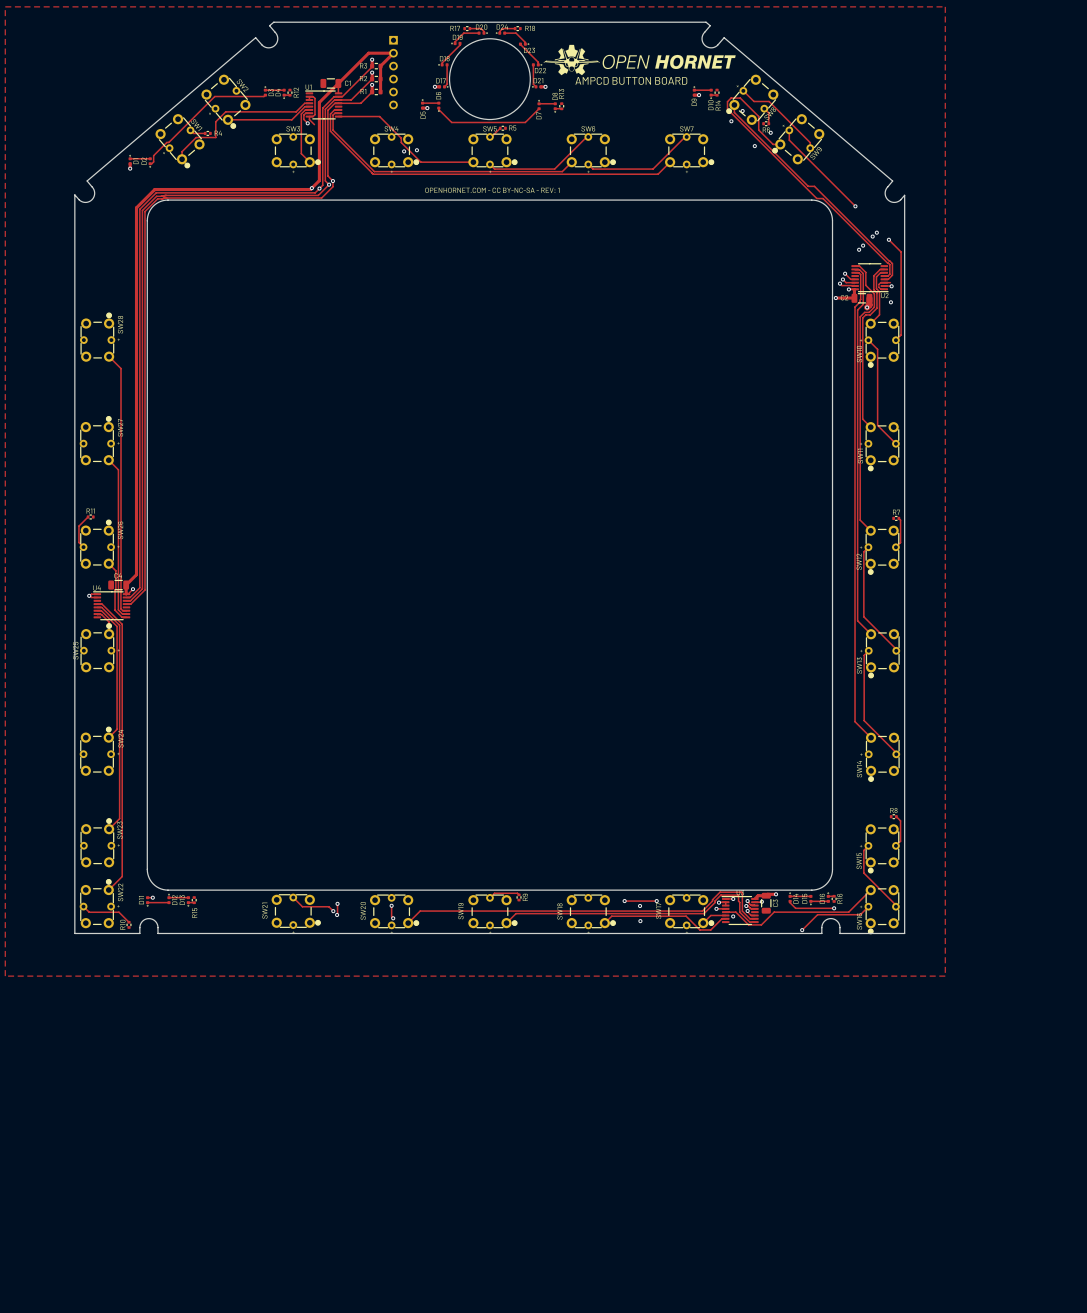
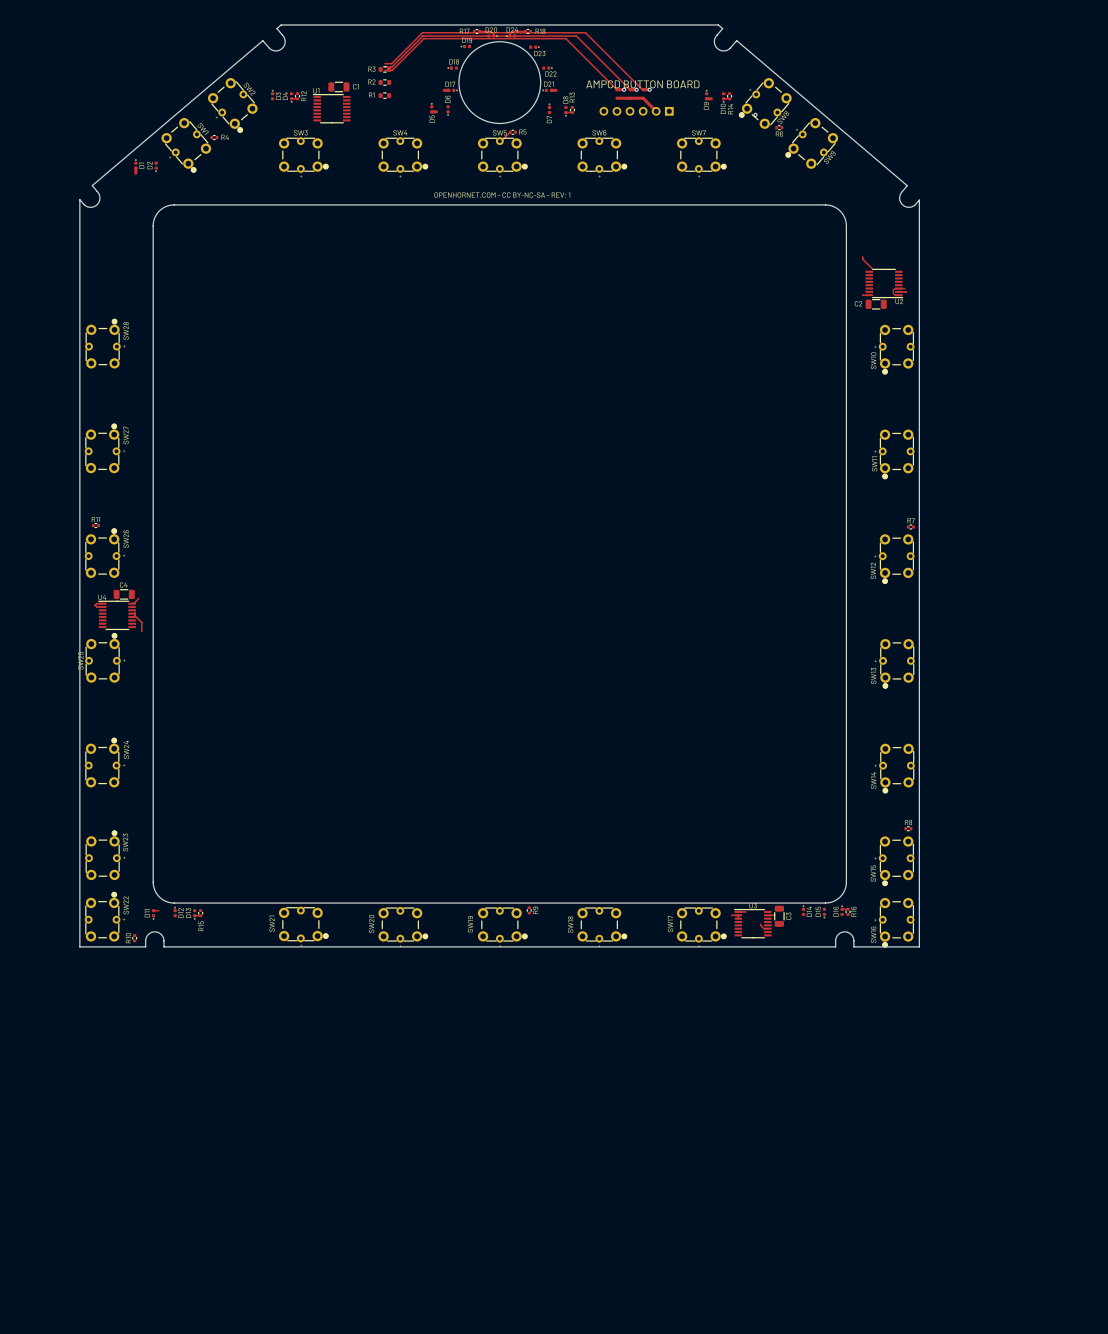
zone outline: (5, 6) (5, 976) (945, 976) (945, 6) (5, 6) -> none
track: (463, 33) (455, 43) -> (473, 36) (422, 36) (391, 67) (384, 67)
track: none -> (488, 36) (514, 36)
track: (516, 33) (525, 44) -> (526, 36) (576, 36) (630, 89) (636, 89)
track: (460, 43) (442, 64) -> none
track: (520, 44) (538, 62) (538, 64) -> none
drawing: [543, 44, 736, 76] -> none
track: (372, 59) (372, 66) (342, 96) (334, 96) (322, 108) (322, 185) (315, 192) (156, 192) (139, 209) (139, 587) (130, 597) (126, 597) -> none
via: (372, 59) -> none
track: none -> (384, 63) (391, 63) (422, 32) (585, 32) (642, 89) (649, 89)
track: (447, 64) (447, 84) (444, 86) -> none
track: (533, 64) (533, 84) (535, 86) -> none
track: none -> (384, 70) (392, 70) (424, 38) (565, 38) (616, 89) (624, 89)
track: (372, 72) (372, 79) (351, 99) (334, 99) (325, 109) (325, 180) (329, 184) (318, 195) (166, 195) -> none
via: (372, 72) -> none
part: (393, 72) -> none
track: (338, 83) (338, 93) -> none
track: (372, 84) (372, 92) (360, 103) (334, 103) (327, 110) (327, 176) (332, 181) (332, 186) (321, 198) (166, 198) -> none
via: (372, 84) -> none
via: (434, 86) -> none
via: (545, 86) -> none
via: none -> (624, 89)
via: none -> (636, 89)
via: none -> (649, 89)
track: (265, 90) (284, 90) -> none
track: (694, 90) (711, 90) -> none
track: (743, 90) (754, 101) (769, 101) (810, 142) (810, 148) -> none
track: (380, 92) (380, 66) (393, 53) (368, 53) (319, 102) (319, 180) (310, 189) (154, 189) (136, 207) (136, 574) (126, 585) (126, 593) -> none
track: none -> (616, 98) (643, 98) (656, 111)
track: (265, 95) (214, 96) (153, 155) (153, 161) (150, 163) -> none
via: (699, 95) -> none
track: (309, 99) (309, 96) (314, 98) (314, 114) (309, 116) (309, 119) (314, 124) -> none
track: (309, 103) (304, 103) (296, 111) (225, 111) (215, 121) (215, 137) (196, 137) (182, 151) (182, 159) -> none
track: (422, 103) (438, 103) -> none
track: (539, 103) (555, 103) -> none
track: (734, 104) (734, 112) (808, 186) (814, 186) (892, 263) (892, 275) (888, 279) (884, 279) -> none
track: (309, 106) (305, 106) (291, 119) (227, 119) -> none
part: none -> (636, 111)
via: (427, 108) -> none
track: (438, 108) (451, 122) (525, 122) (539, 108) -> none
track: (764, 108) (768, 113) (768, 123) -> none
track: (309, 109) (305, 109) (301, 114) (301, 153) (309, 162) -> none
track: (338, 109) (334, 109) (330, 114) (330, 131) (373, 174) (658, 174) (670, 162) -> none
track: (309, 113) (303, 115) (303, 119) (307, 123) -> none
track: (338, 113) (333, 115) (333, 130) (374, 171) (562, 171) (571, 162) -> none
track: (338, 116) (379, 116) (401, 138) (401, 142) (420, 162) (473, 162) -> none
via: (731, 121) -> none
via: (307, 123) -> none
track: (190, 130) (193, 133) (205, 133) -> none
track: (789, 130) (789, 140) (855, 206) -> none
via: (770, 132) -> none
track: (588, 136) (554, 169) (494, 169) (489, 164) -> none
track: (686, 136) (653, 169) (592, 169) (588, 164) -> none
track: (780, 144) (773, 144) (758, 130) (758, 116) (740, 98) (731, 98) (727, 101) (727, 109) (816, 198) (823, 198) (889, 264) (889, 274) (884, 276) -> none
via: (754, 146) -> none
via: (416, 150) -> none
via: (404, 151) -> none
track: (130, 158) (150, 158) -> none
via: (130, 168) -> none
via: (332, 181) -> none
via: (329, 184) -> none
via: (311, 188) -> none
via: (319, 188) -> none
track: (162, 196) (156, 196) (142, 210) (142, 588) (130, 600) (126, 600) -> none
track: (162, 198) (157, 198) (145, 211) (145, 589) (130, 604) (126, 604) -> none
via: (855, 206) -> none
via: (876, 232) -> none
via: (872, 236) -> none
track: (888, 239) (901, 251) (901, 335) (895, 340) -> none
via: (888, 239) -> none
via: (863, 245) -> none
via: (859, 249) -> none
track: none -> (862, 256) (872, 268)
track: (855, 266) (859, 266) (865, 272) (865, 285) (874, 293) (874, 307) (860, 316) (860, 520) (870, 530) -> none
track: (855, 269) (859, 269) (863, 273) (863, 304) (857, 310) (857, 620) (871, 634) -> none
track: (884, 269) (880, 269) (873, 275) (876, 308) (870, 314) (865, 314) (862, 317) (862, 419) (870, 427) -> none
track: (855, 272) (860, 274) (860, 299) (855, 307) (855, 721) (871, 737) -> none
track: (884, 272) (880, 272) (876, 276) (876, 288) (879, 291) (879, 314) (870, 323) -> none
track: (845, 273) (850, 279) (855, 279) -> none
via: (845, 273) -> none
track: (842, 279) (846, 282) (855, 282) -> none
via: (842, 279) -> none
track: (839, 283) (841, 285) (855, 285) -> none
via: (839, 283) -> none
via: (891, 286) -> none
via: (848, 289) -> none
track: (854, 289) (854, 298) (835, 298) -> none
via: (835, 298) -> none
track: (869, 298) (869, 305) (867, 307) -> none
via: (890, 302) -> none
via: (867, 307) -> none
track: (868, 340) (877, 349) (877, 425) (895, 443) -> none
track: (109, 356) (121, 368) (121, 591) -> none
track: (108, 460) (118, 469) (118, 590) -> none
track: (88, 516) (78, 526) (78, 542) (83, 547) -> none
track: (898, 518) (900, 520) (900, 542) (895, 547) -> none
track: (868, 547) (863, 551) (863, 616) (896, 650) -> none
track: (108, 563) (115, 570) (115, 610) (122, 617) (126, 617) -> none
via: (132, 589) -> none
track: (118, 590) (118, 609) (122, 614) (126, 613) -> none
track: (120, 591) (120, 608) (126, 610) -> none
via: (89, 595) -> none
track: none -> (134, 612) (134, 615) (141, 622) (141, 631)
track: (97, 604) (102, 604) (122, 624) (122, 876) (108, 890) -> none
track: (97, 607) (101, 607) (119, 625) (119, 818) (109, 829) -> none
track: (97, 610) (101, 610) (117, 626) (117, 729) (108, 737) -> none
track: (97, 614) (101, 614) (109, 622) (109, 634) -> none
track: (868, 650) (864, 655) (864, 720) (896, 754) -> none
track: (896, 816) (900, 820) (900, 841) (895, 845) -> none
track: (868, 845) (863, 850) (863, 873) (895, 906) -> none
track: (870, 890) (848, 912) (774, 912) (761, 924) (748, 924) (735, 912) (725, 912) -> none
track: (519, 894) (494, 893) (489, 897) -> none
track: (776, 894) (758, 895) (755, 898) -> none
via: (776, 894) -> none
track: (790, 896) (810, 896) -> none
via: (152, 897) -> none
track: (168, 897) (188, 897) -> none
track: (293, 897) (302, 906) (328, 906) (333, 911) -> none
via: (733, 898) -> none
track: (624, 901) (656, 901) -> none
via: (624, 901) -> none
via: (656, 901) -> none
track: (747, 901) (750, 905) (754, 905) -> none
via: (747, 901) -> none
via: (761, 901) -> none
track: (790, 901) (795, 908) (834, 908) -> none
track: (810, 901) (828, 901) -> none
track: (147, 902) (168, 902) -> none
via: (718, 902) -> none
track: (337, 903) (337, 914) -> none
via: (337, 903) -> none
track: (391, 905) (393, 918) -> none
via: (391, 905) -> none
via: (640, 905) -> none
track: (83, 906) (89, 912) (118, 912) (129, 922) -> none
track: (746, 906) (754, 908) -> none
via: (746, 906) -> none
track: (868, 906) (860, 914) (817, 914) (802, 930) -> none
track: (716, 908) (725, 908) -> none
via: (716, 908) -> none
via: (834, 908) -> none
via: (747, 910) -> none
via: (333, 911) -> none
via: (337, 914) -> none
track: (725, 915) (710, 915) (703, 923) -> none
via: (733, 916) -> none
via: (393, 918) -> none
track: (725, 918) (721, 918) (710, 929) (699, 929) (686, 916) (611, 916) (604, 923) -> none
track: (754, 918) (750, 918) (742, 911) (741, 892) (720, 892) (702, 911) (420, 911) (408, 923) -> none
via: (640, 921) -> none
track: (754, 922) (749, 922) (739, 912) (738, 895) (720, 895) (704, 913) (515, 913) (506, 923) -> none
via: (802, 930) -> none

